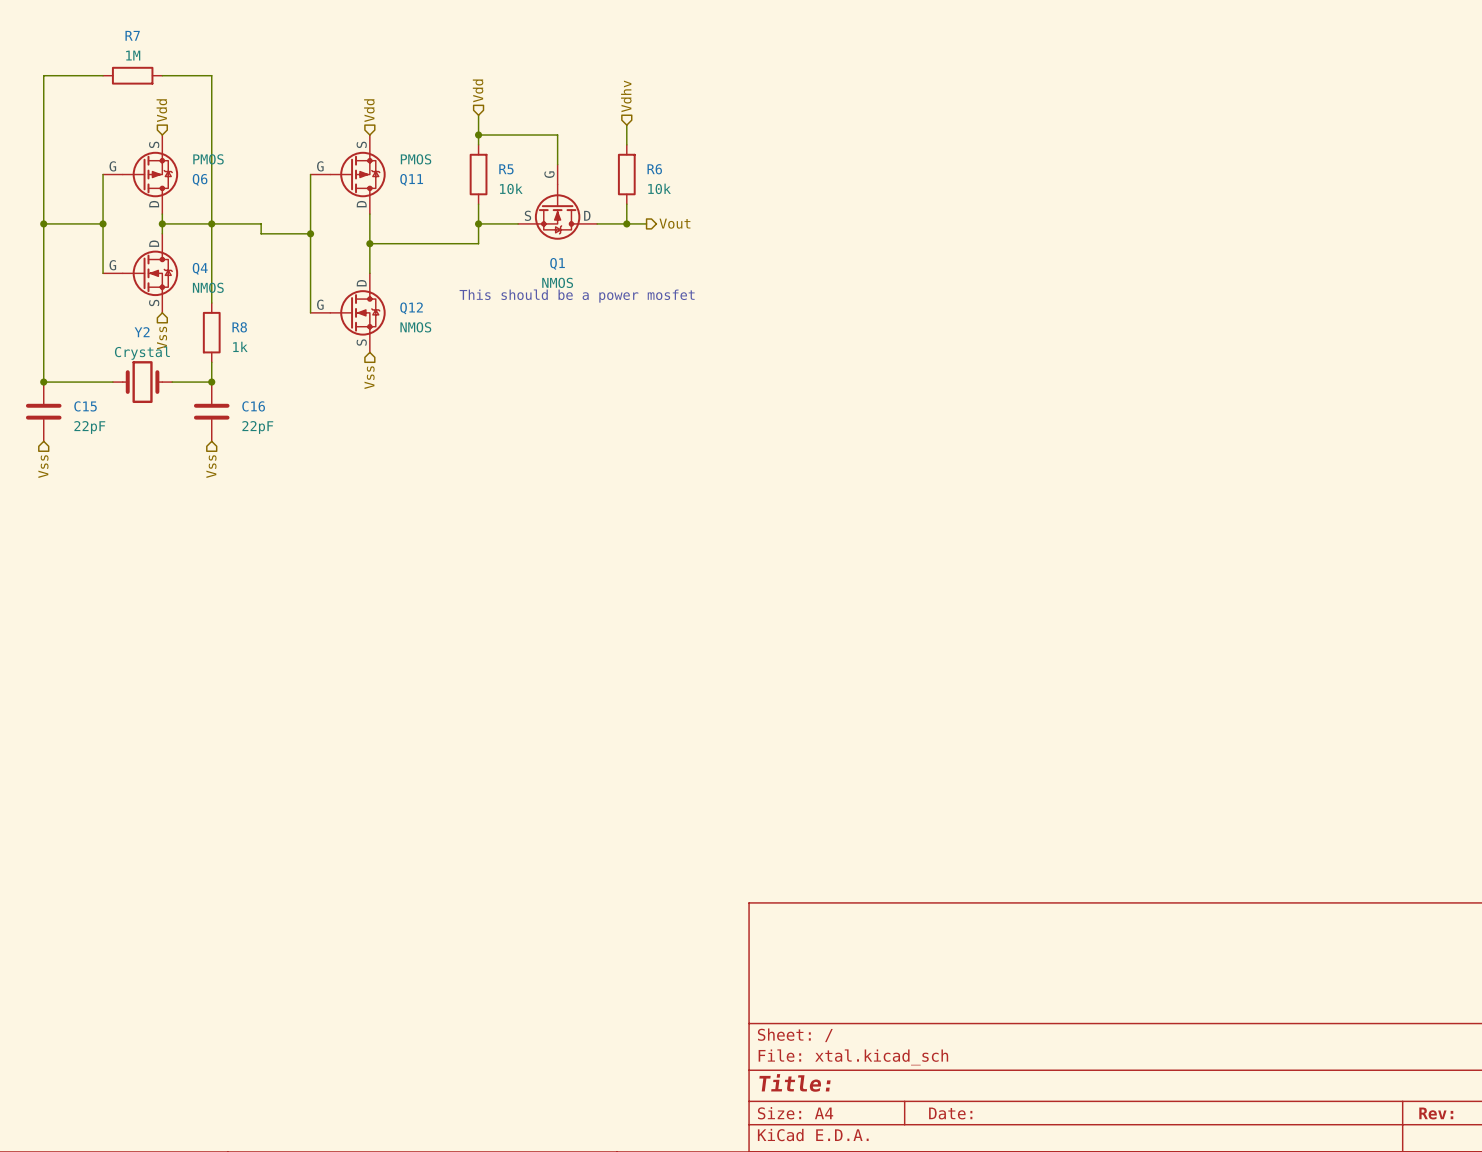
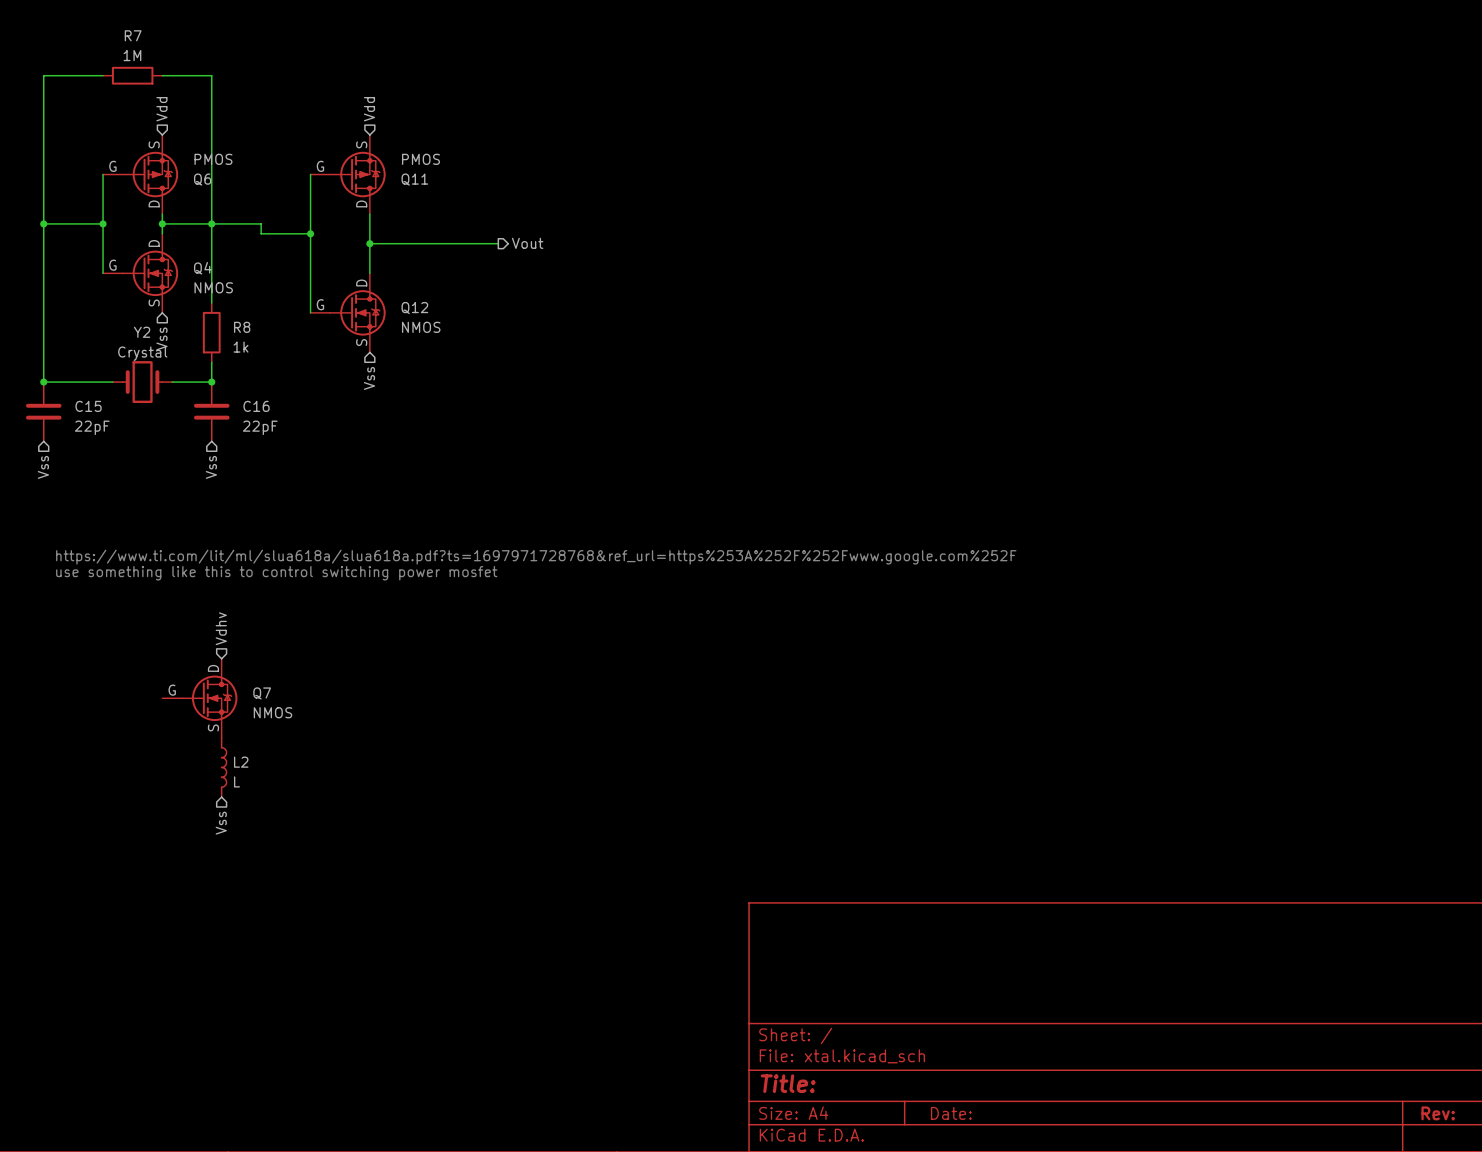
hierarchical label: Vdd (478, 90) -> none
hierarchical label: Vdhv (626, 96) -> none
wire: (478, 115) (478, 144) -> none
wire: (626, 125) (626, 144) -> none
wire: (478, 135) (557, 135) (557, 164) -> none
junction: (478, 135) -> none
R5: 10k (478, 174) -> none
R6: 10k (626, 174) -> none
Q1: NMOS (557, 202) -> none
wire: (478, 204) (478, 243) -> (498, 243) (478, 243)
wire: (626, 204) (626, 223) -> none
wire: (478, 223) (518, 223) -> none
junction: (478, 223) -> none
wire: (597, 223) (646, 223) -> none
junction: (626, 223) -> none
hierarchical label position: Vout (674, 223) -> Vout (527, 243)
text: This should be a power mosfet (577, 296) -> none
text: none -> https://www.ti.com/lit/ml/slua618a/slua618a.pdf?ts=1697971728768&ref_url=https%253A%252F%252Fwww.google.com%252F (536, 557)
text: none -> use something like this to control switching power mosfet (276, 573)
hierarchical label: none -> Vdhv (221, 628)
Q7: none -> NMOS (199, 698)
L2: none -> L (224, 767)
hierarchical label: none -> Vss (221, 823)

